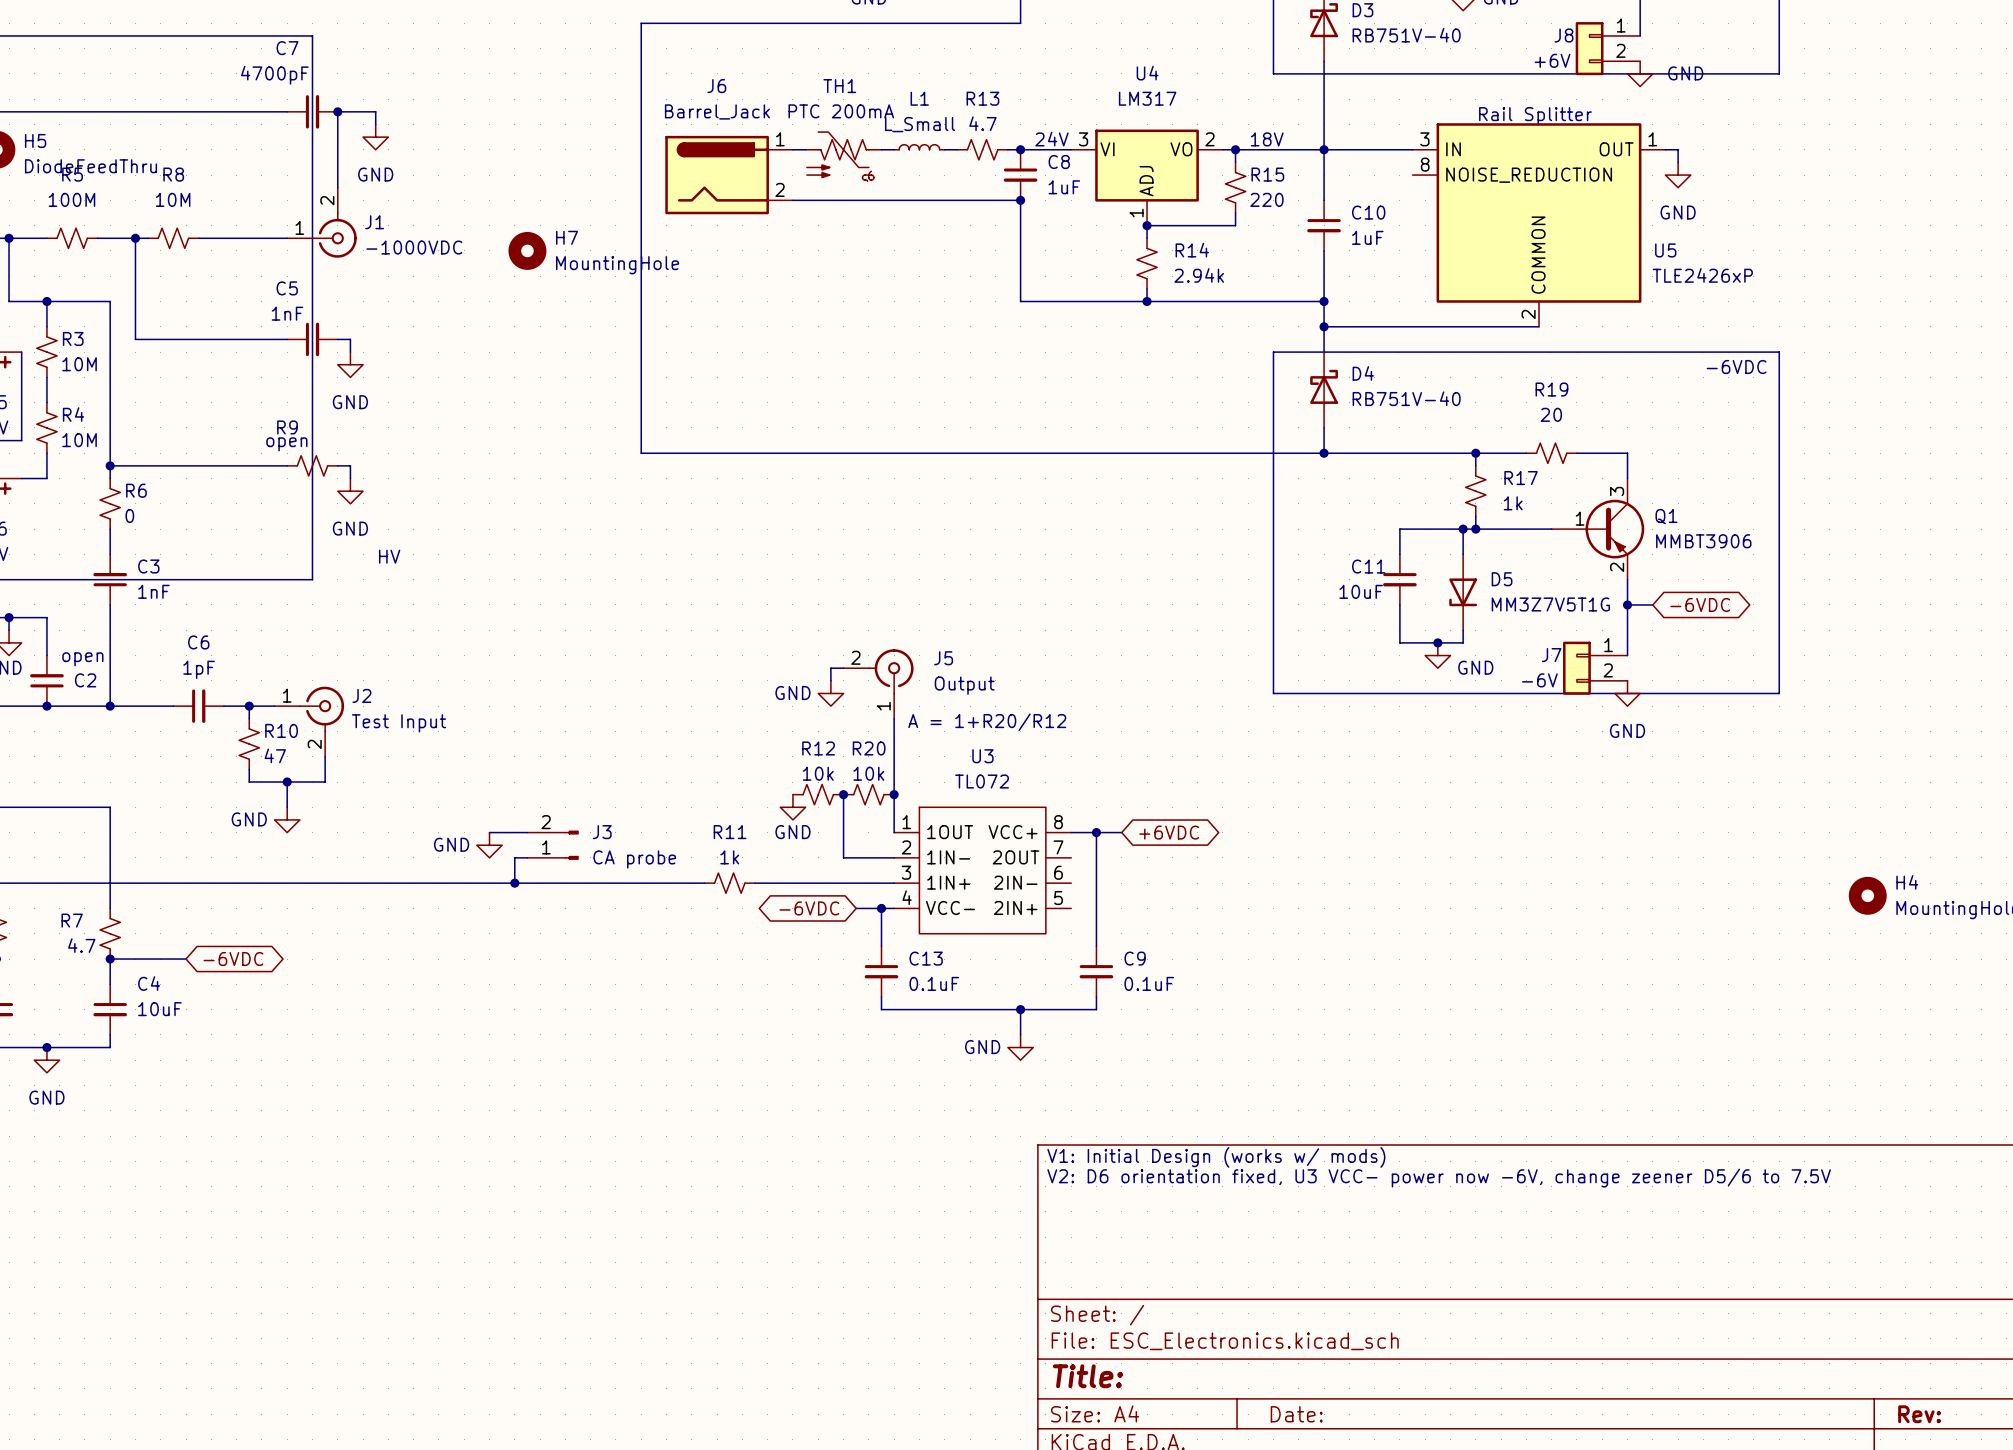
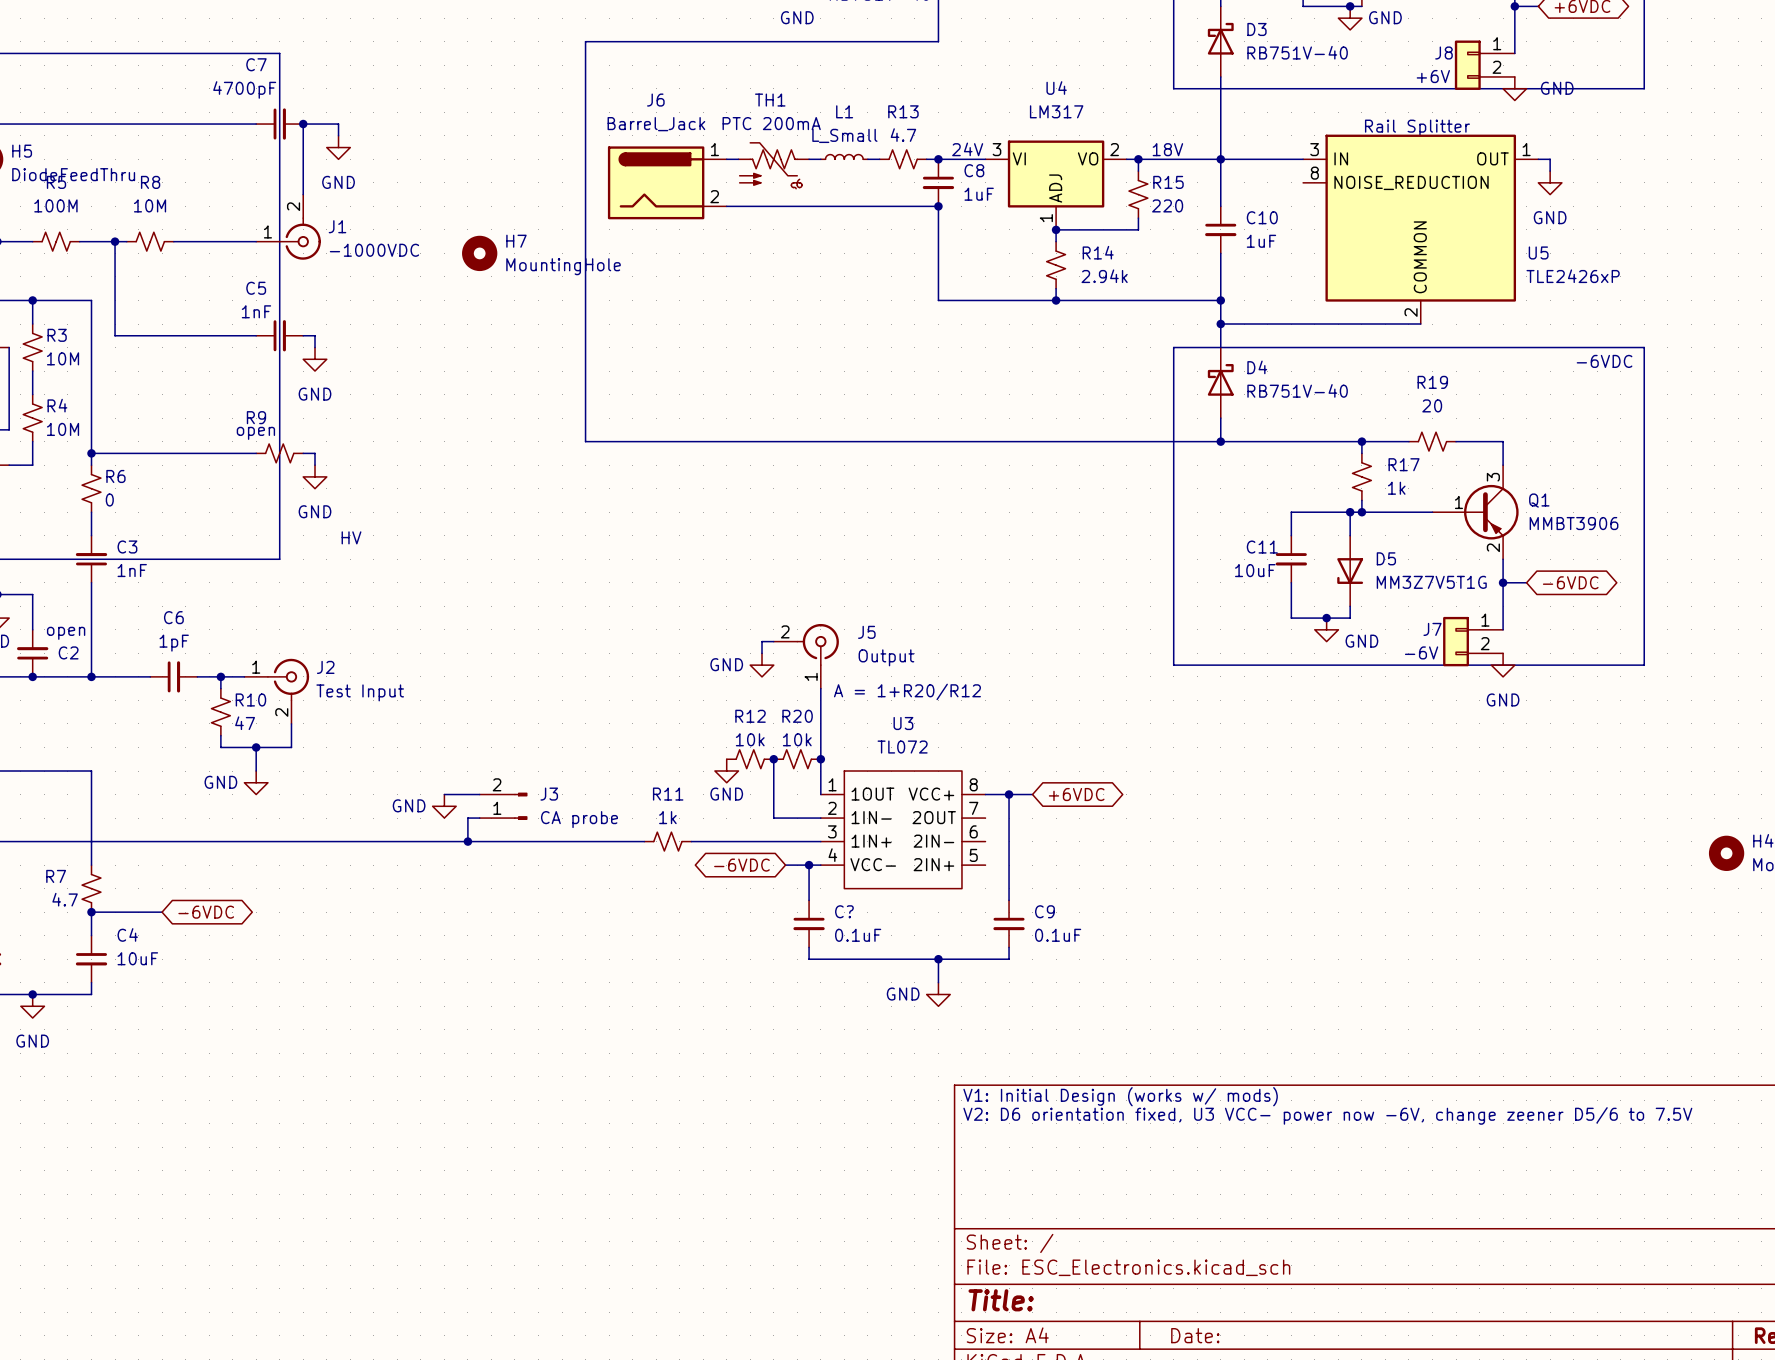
C13 name: C13 (926, 958) -> C? (844, 911)

